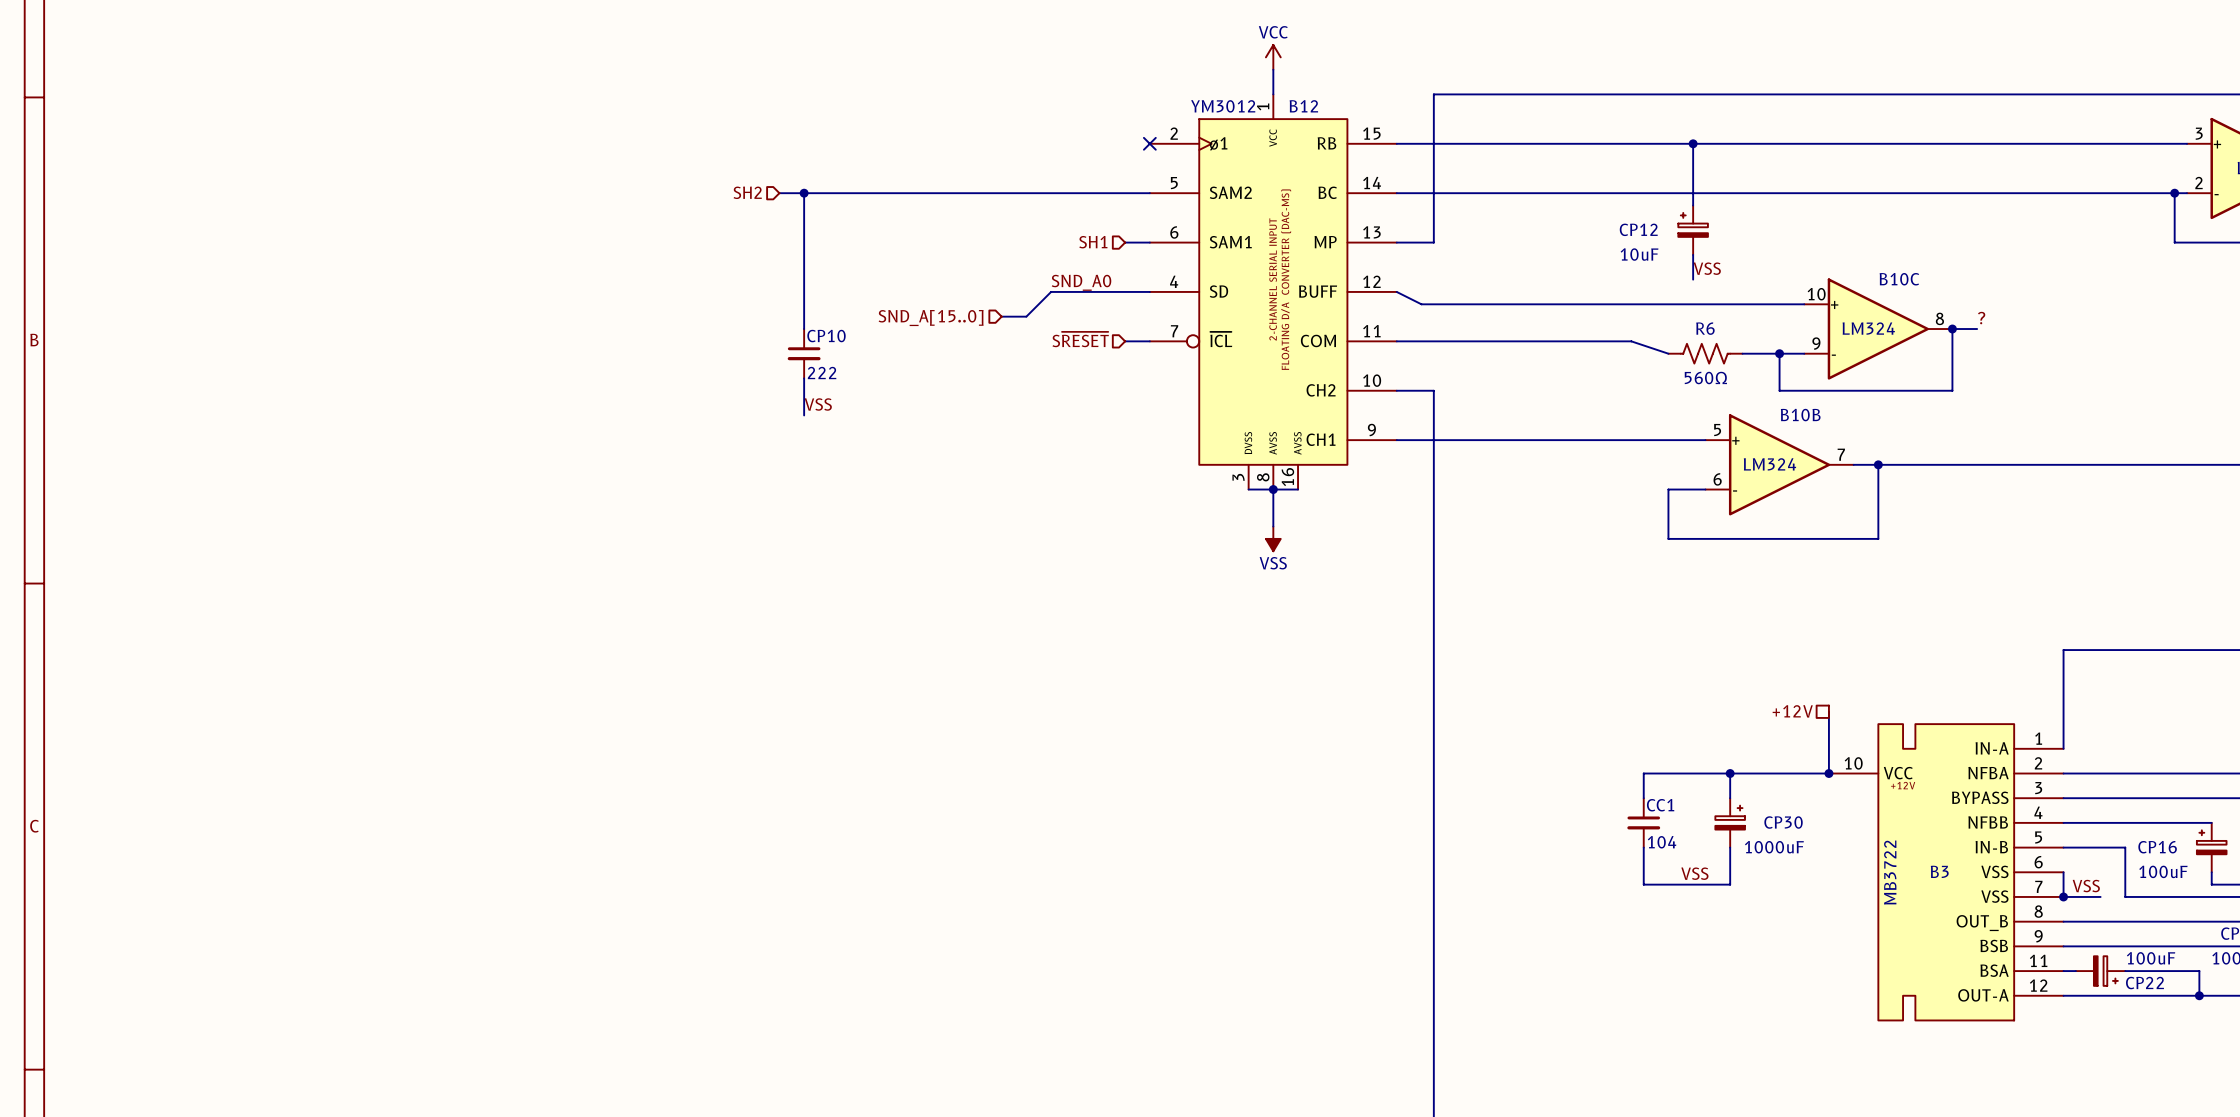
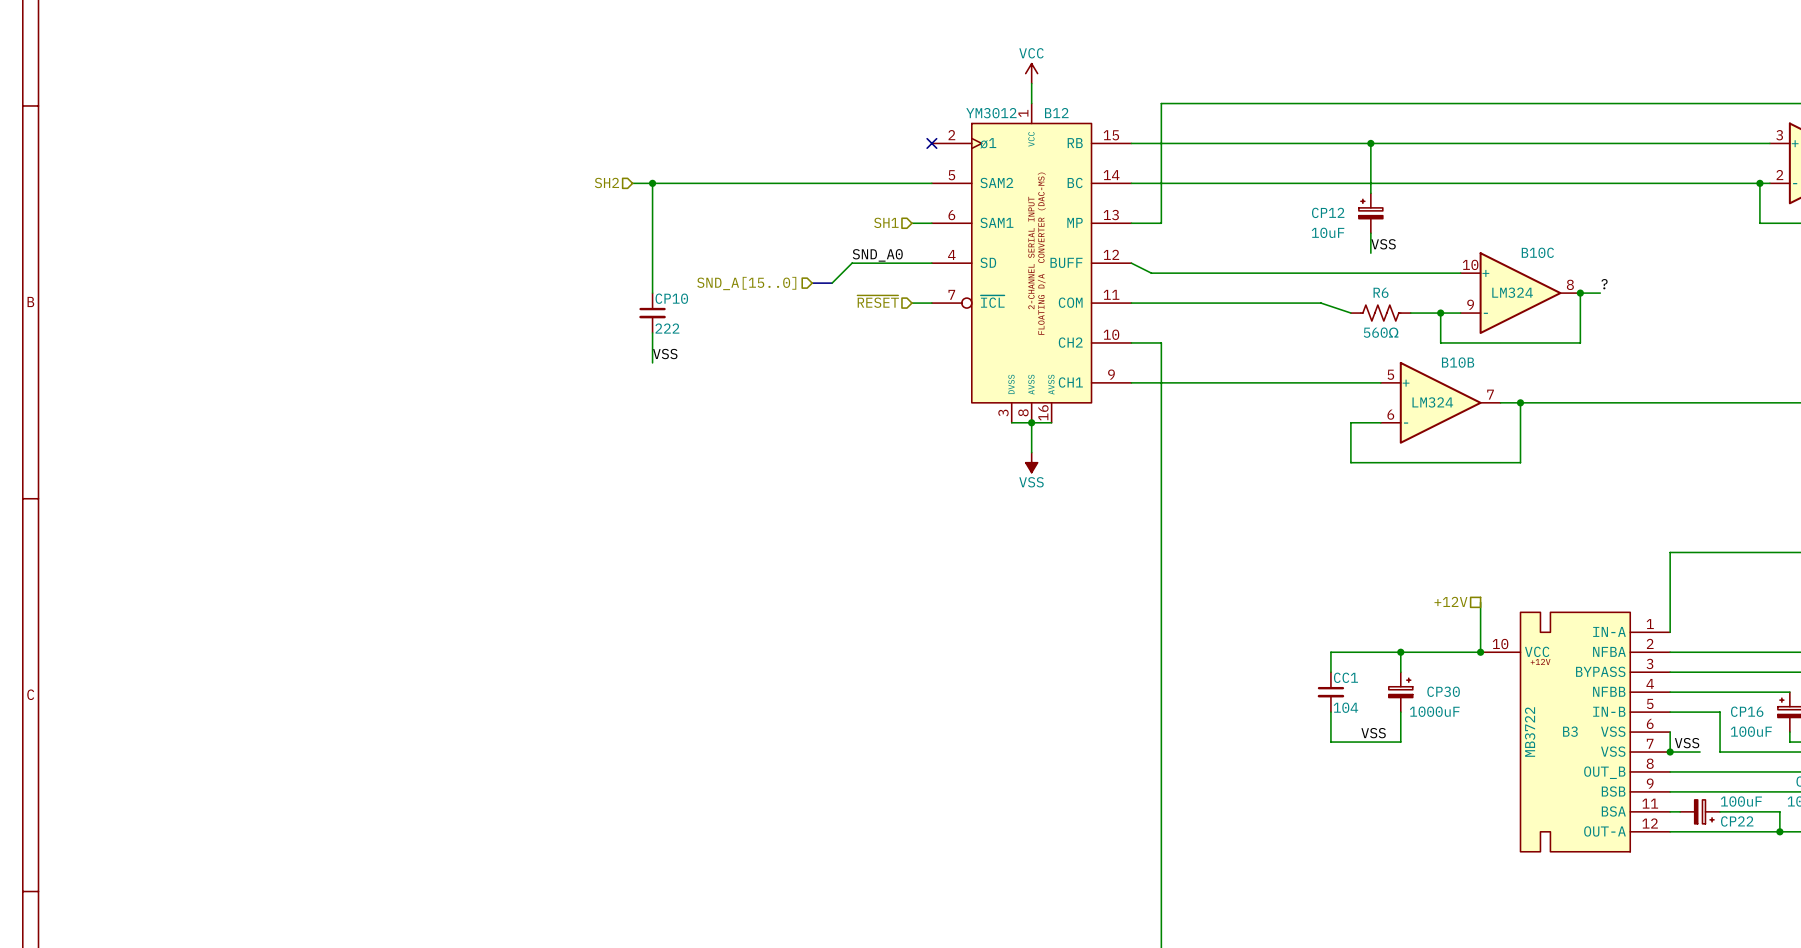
hierarchical label: S~{RESET} (1080, 339) -> ~{RESET} (878, 301)

